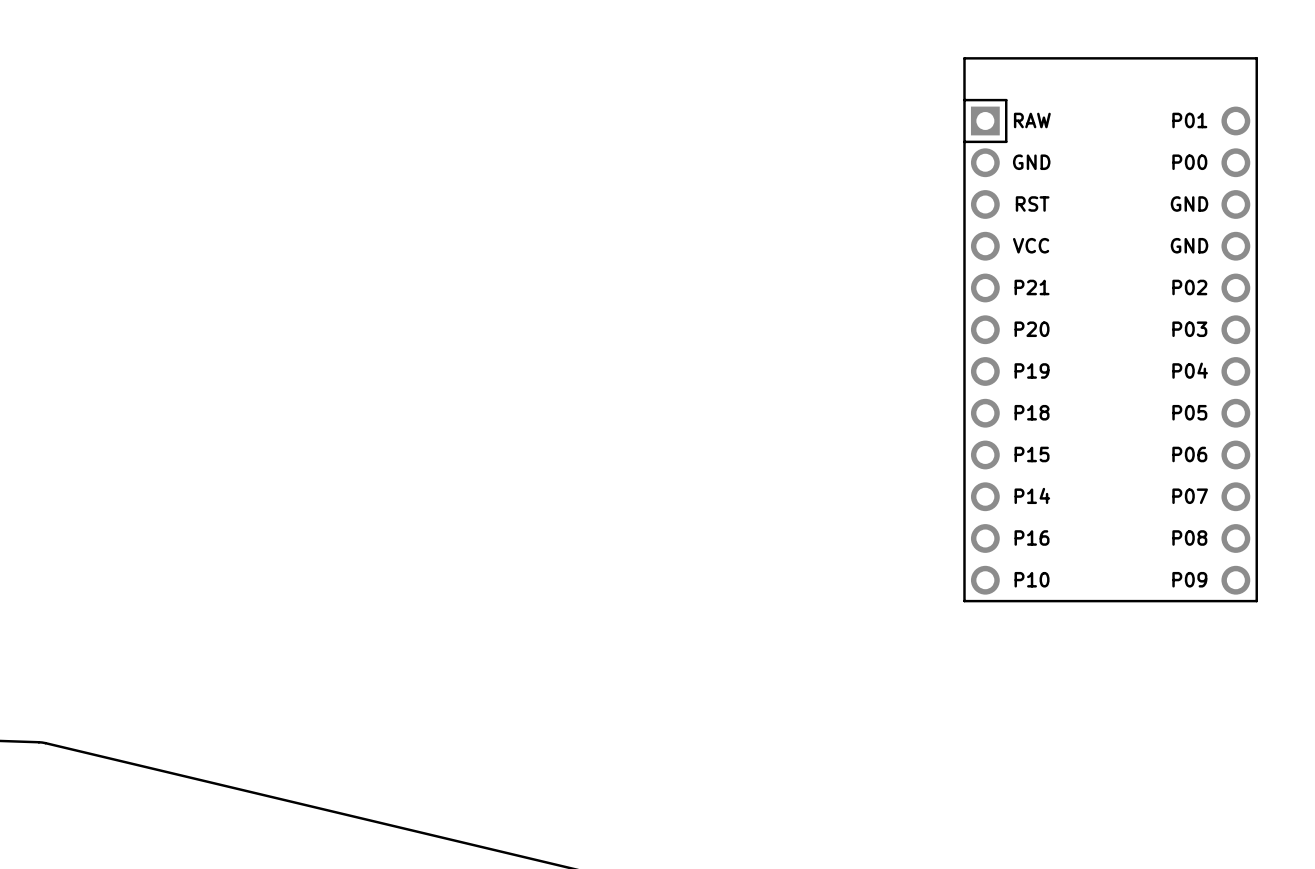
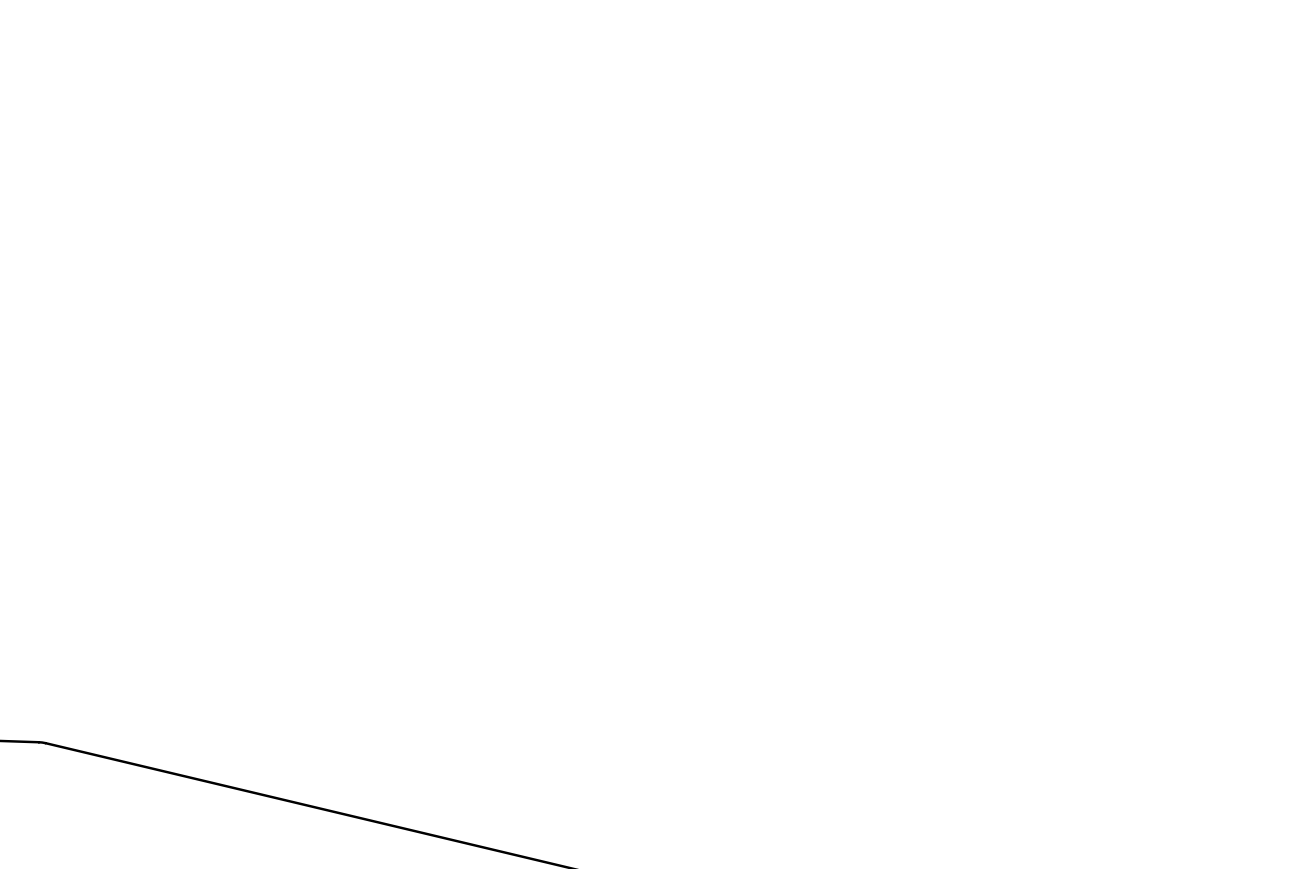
part: (1110, 329) -> none

